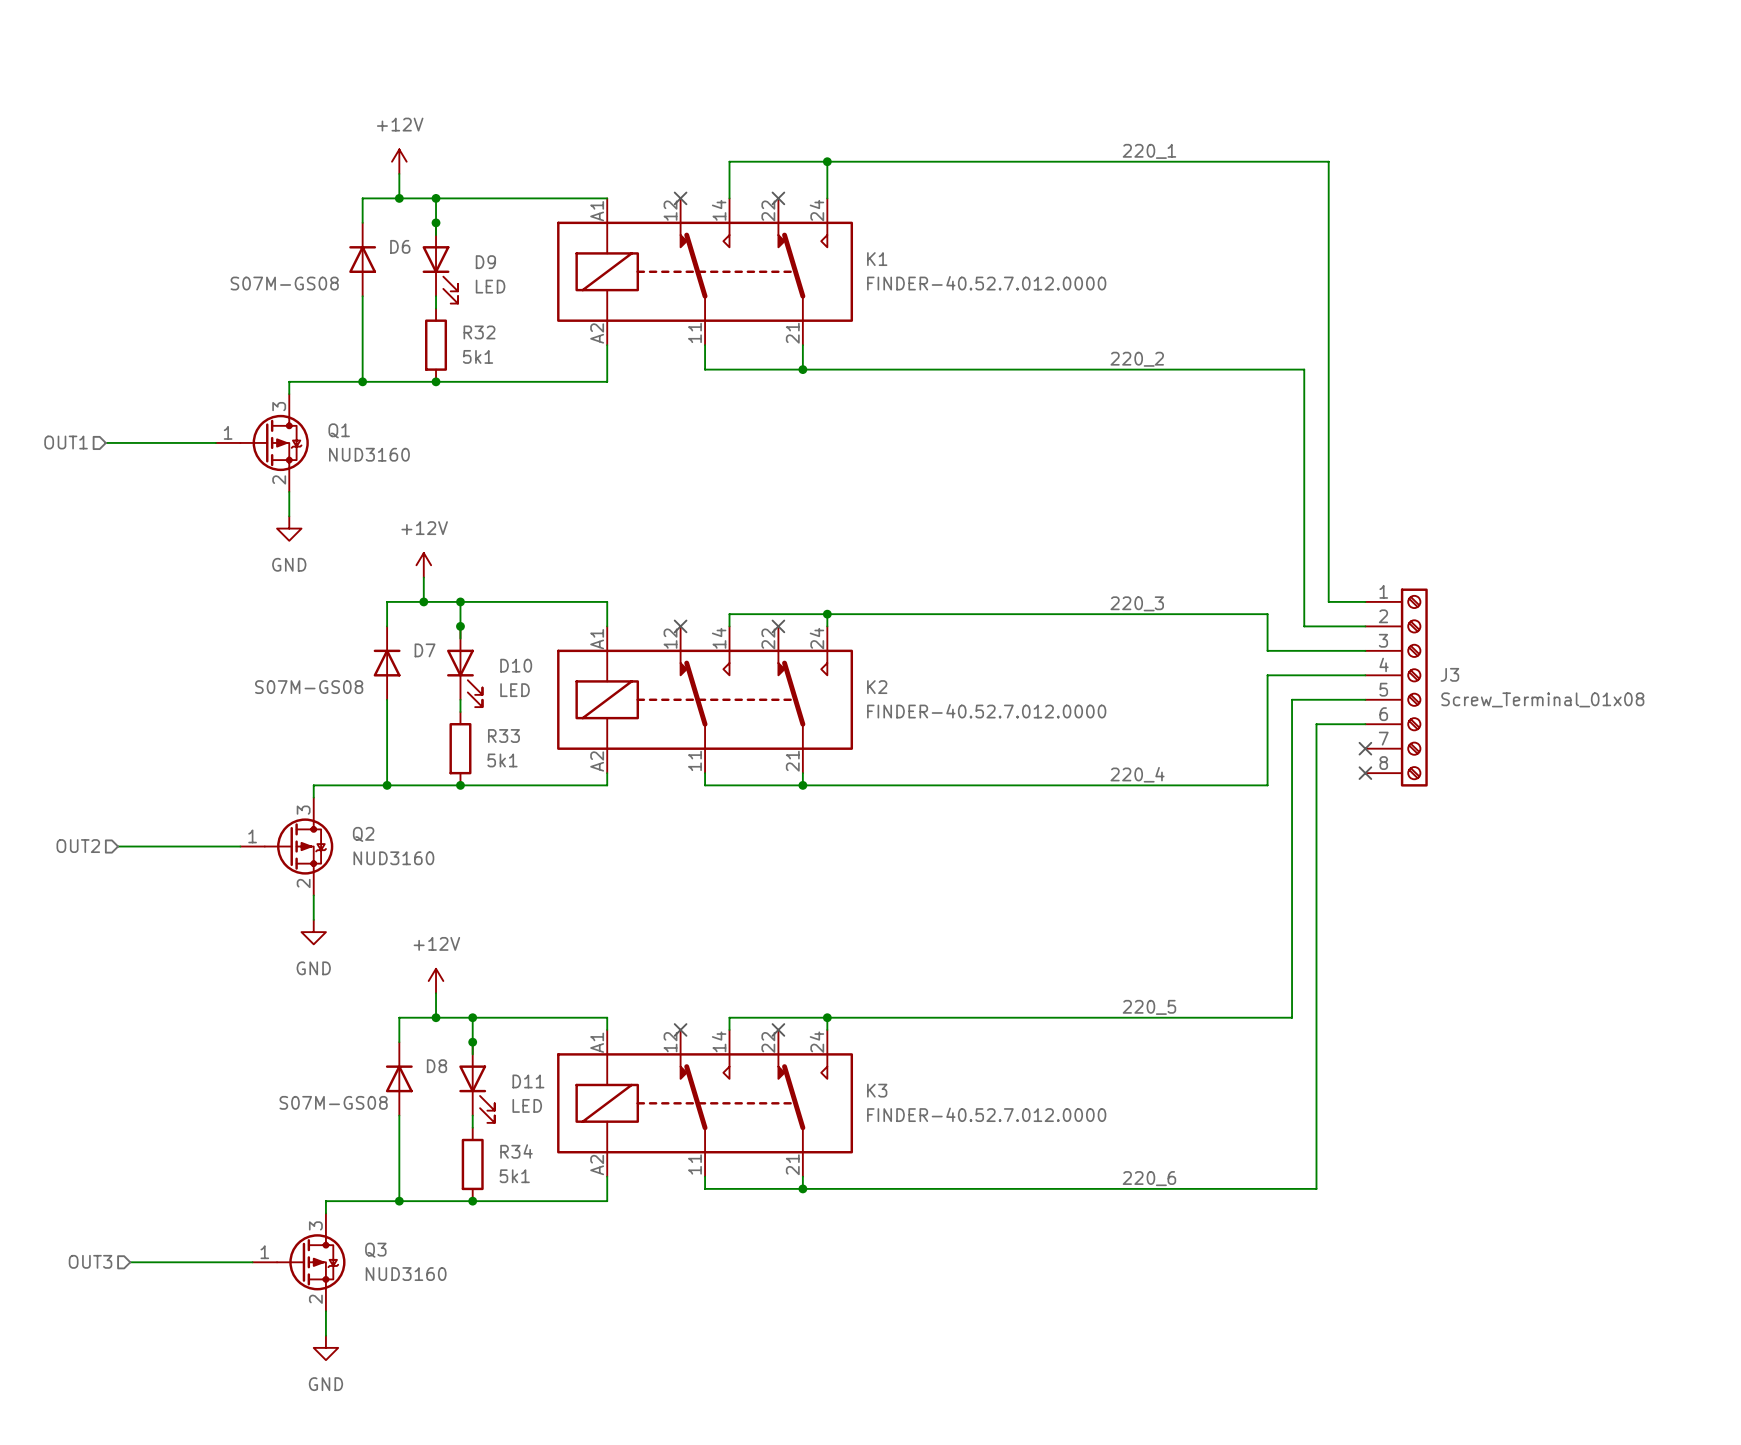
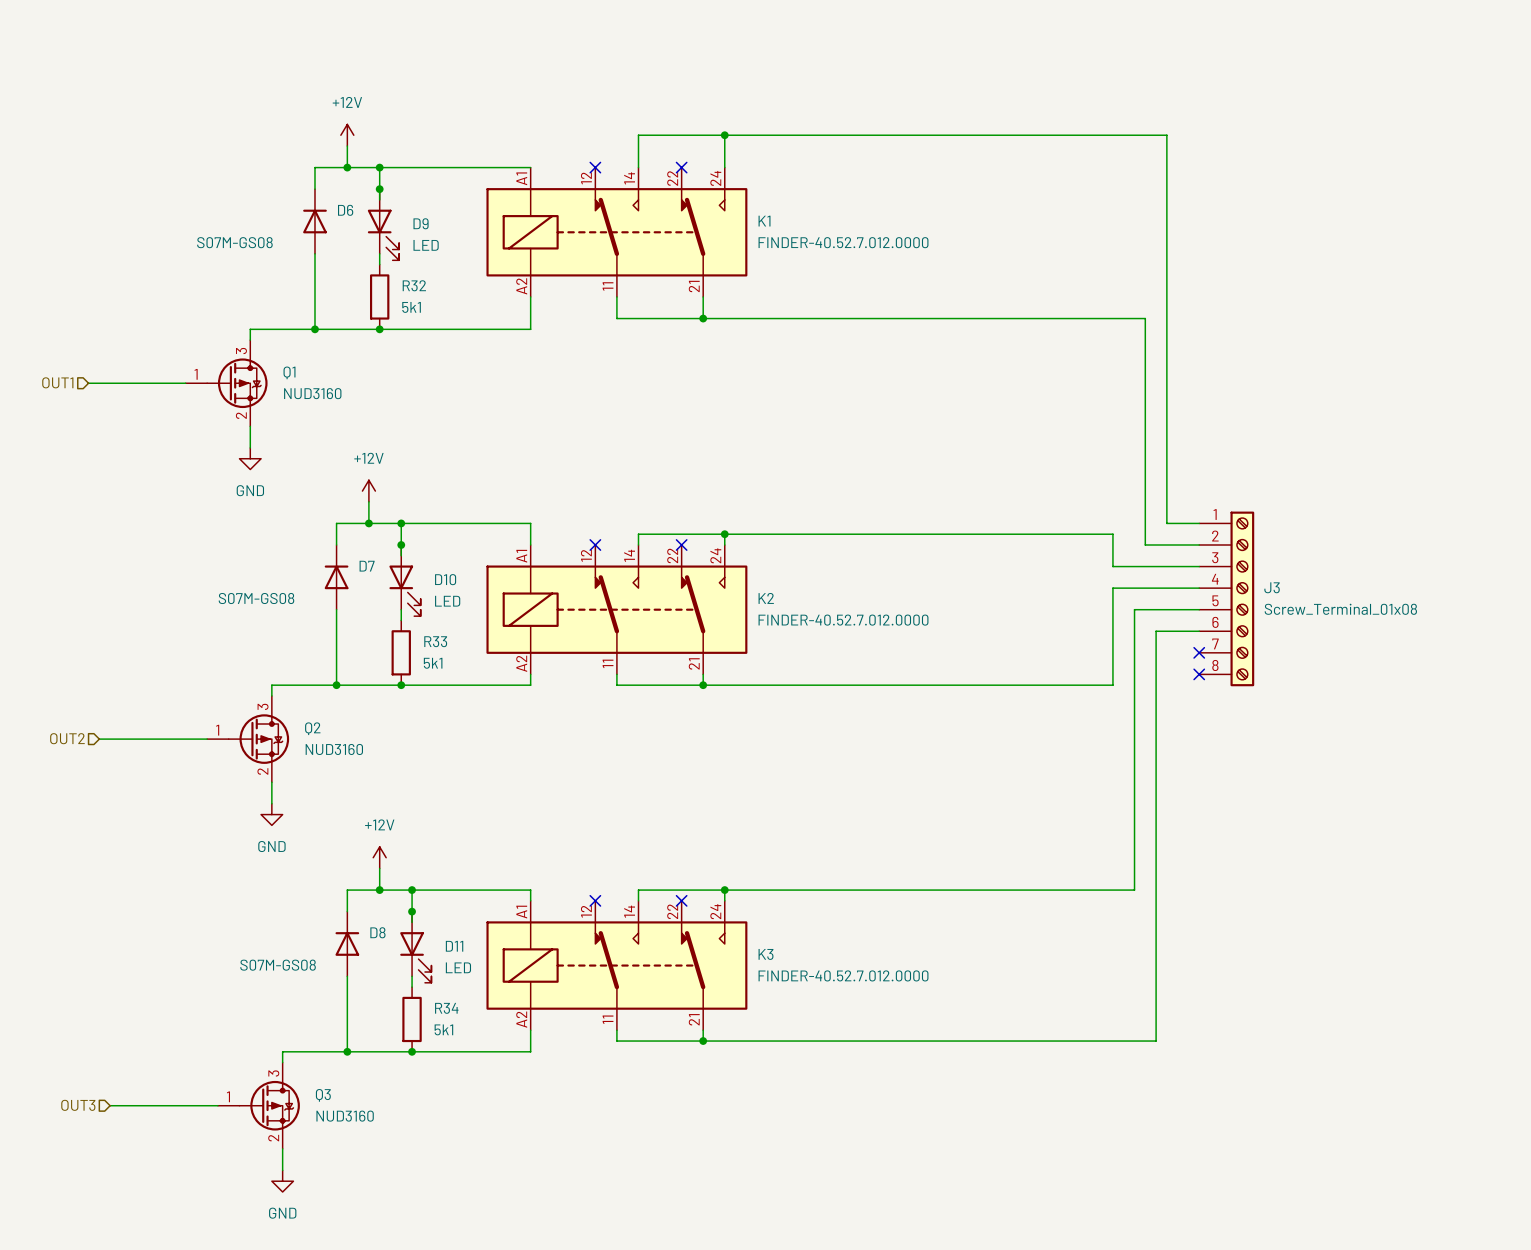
label: 220_1 (1149, 151) -> none
label: 220_2 (1137, 359) -> none
label: 220_3 (1137, 603) -> none
label: 220_4 (1137, 774) -> none
label: 220_5 (1149, 1007) -> none
label: 220_6 (1149, 1178) -> none

